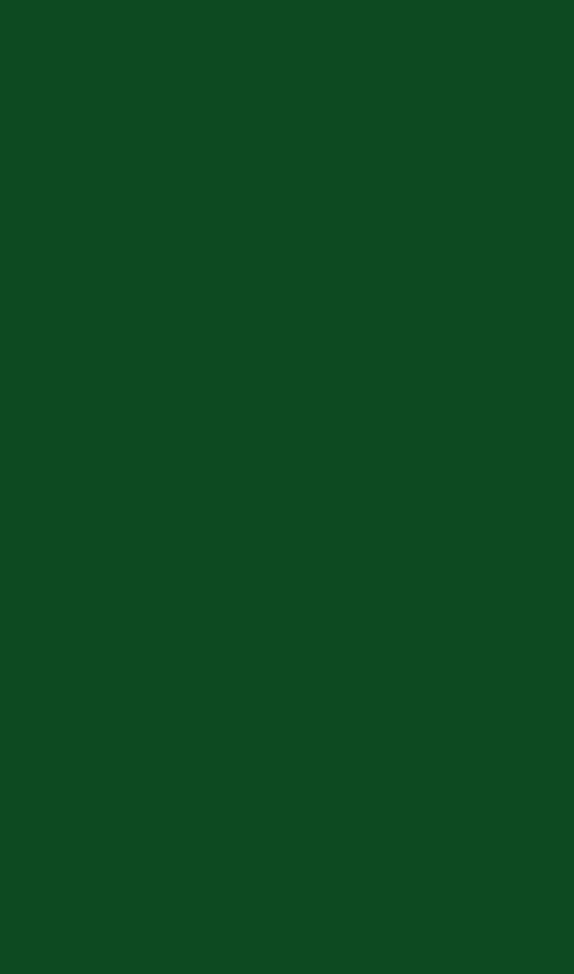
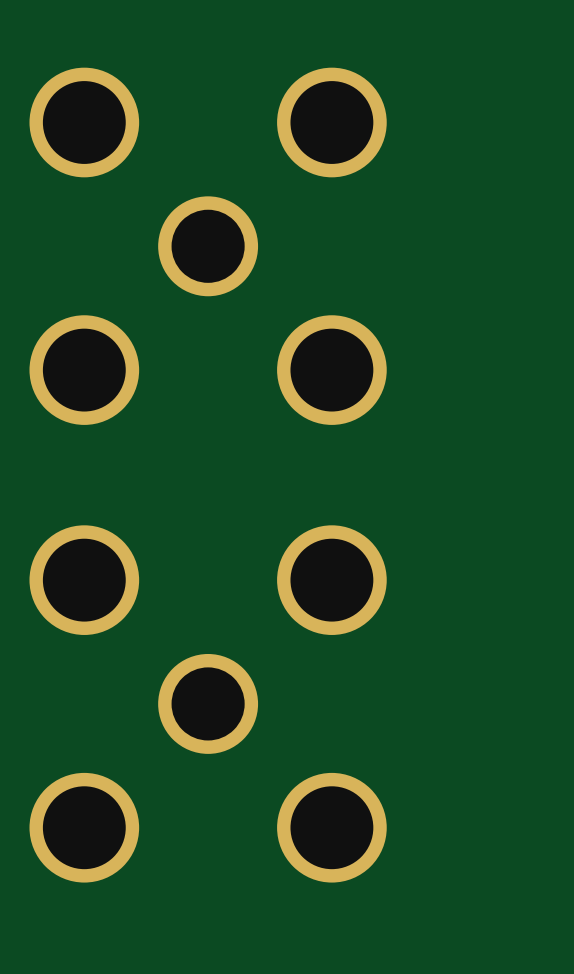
part: none -> (208, 246)
part: none -> (208, 703)

